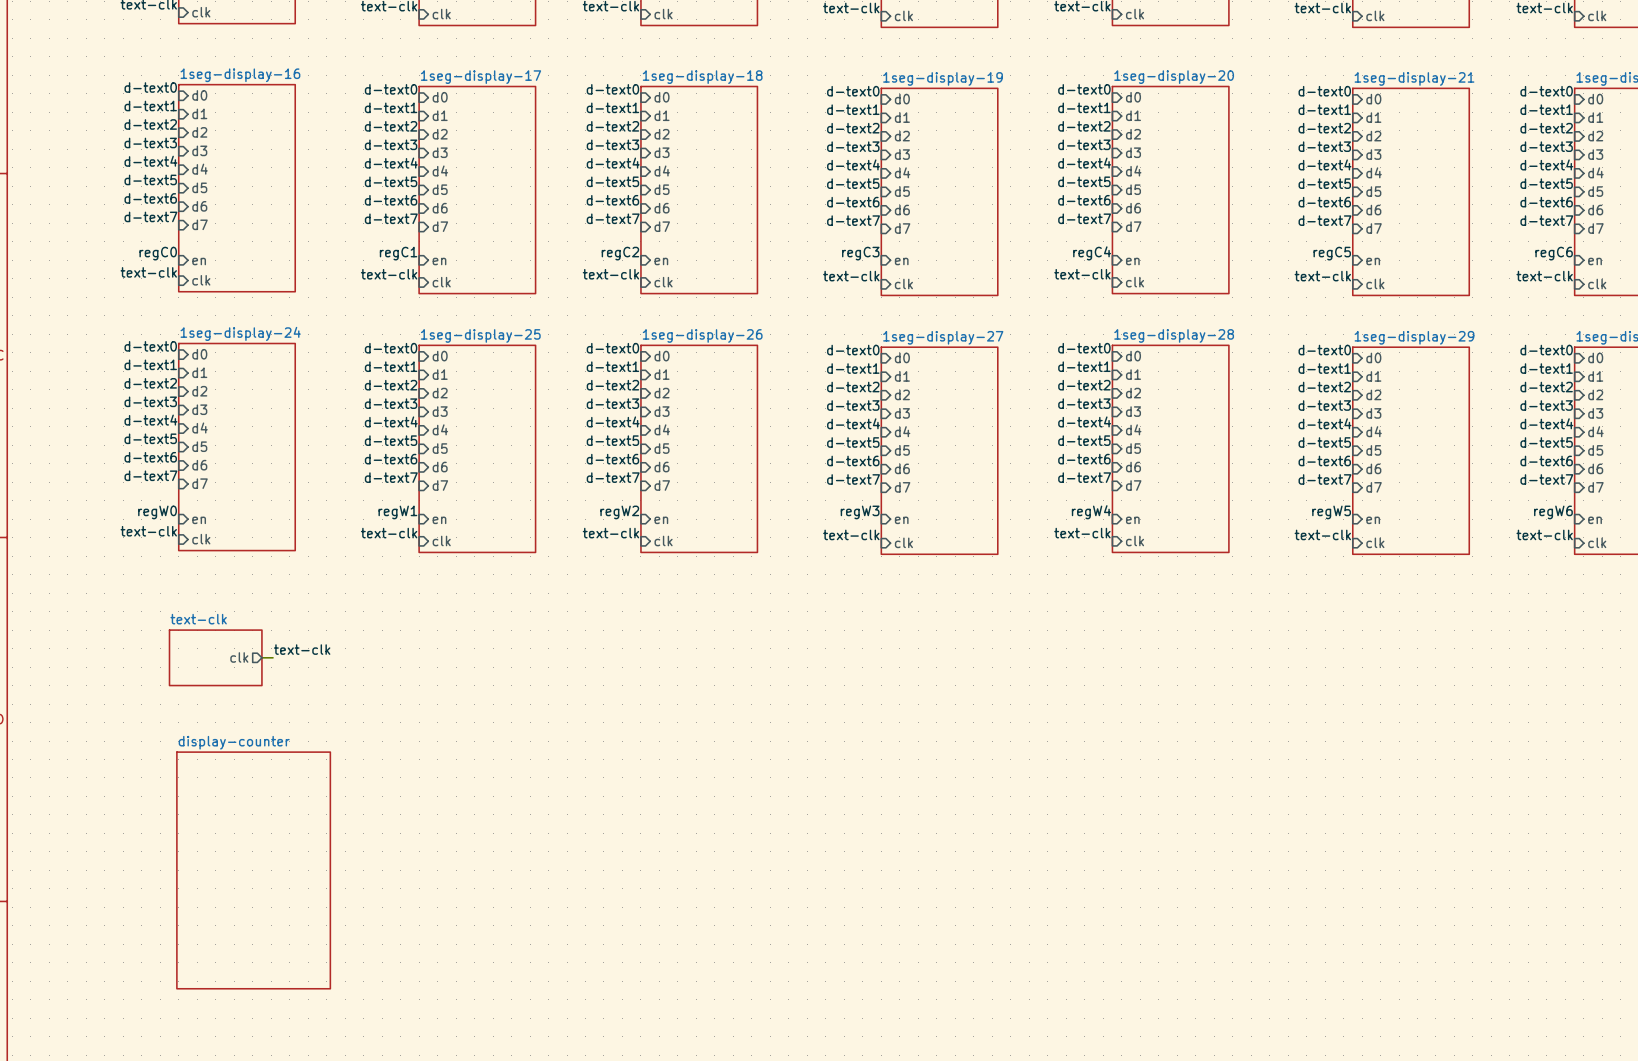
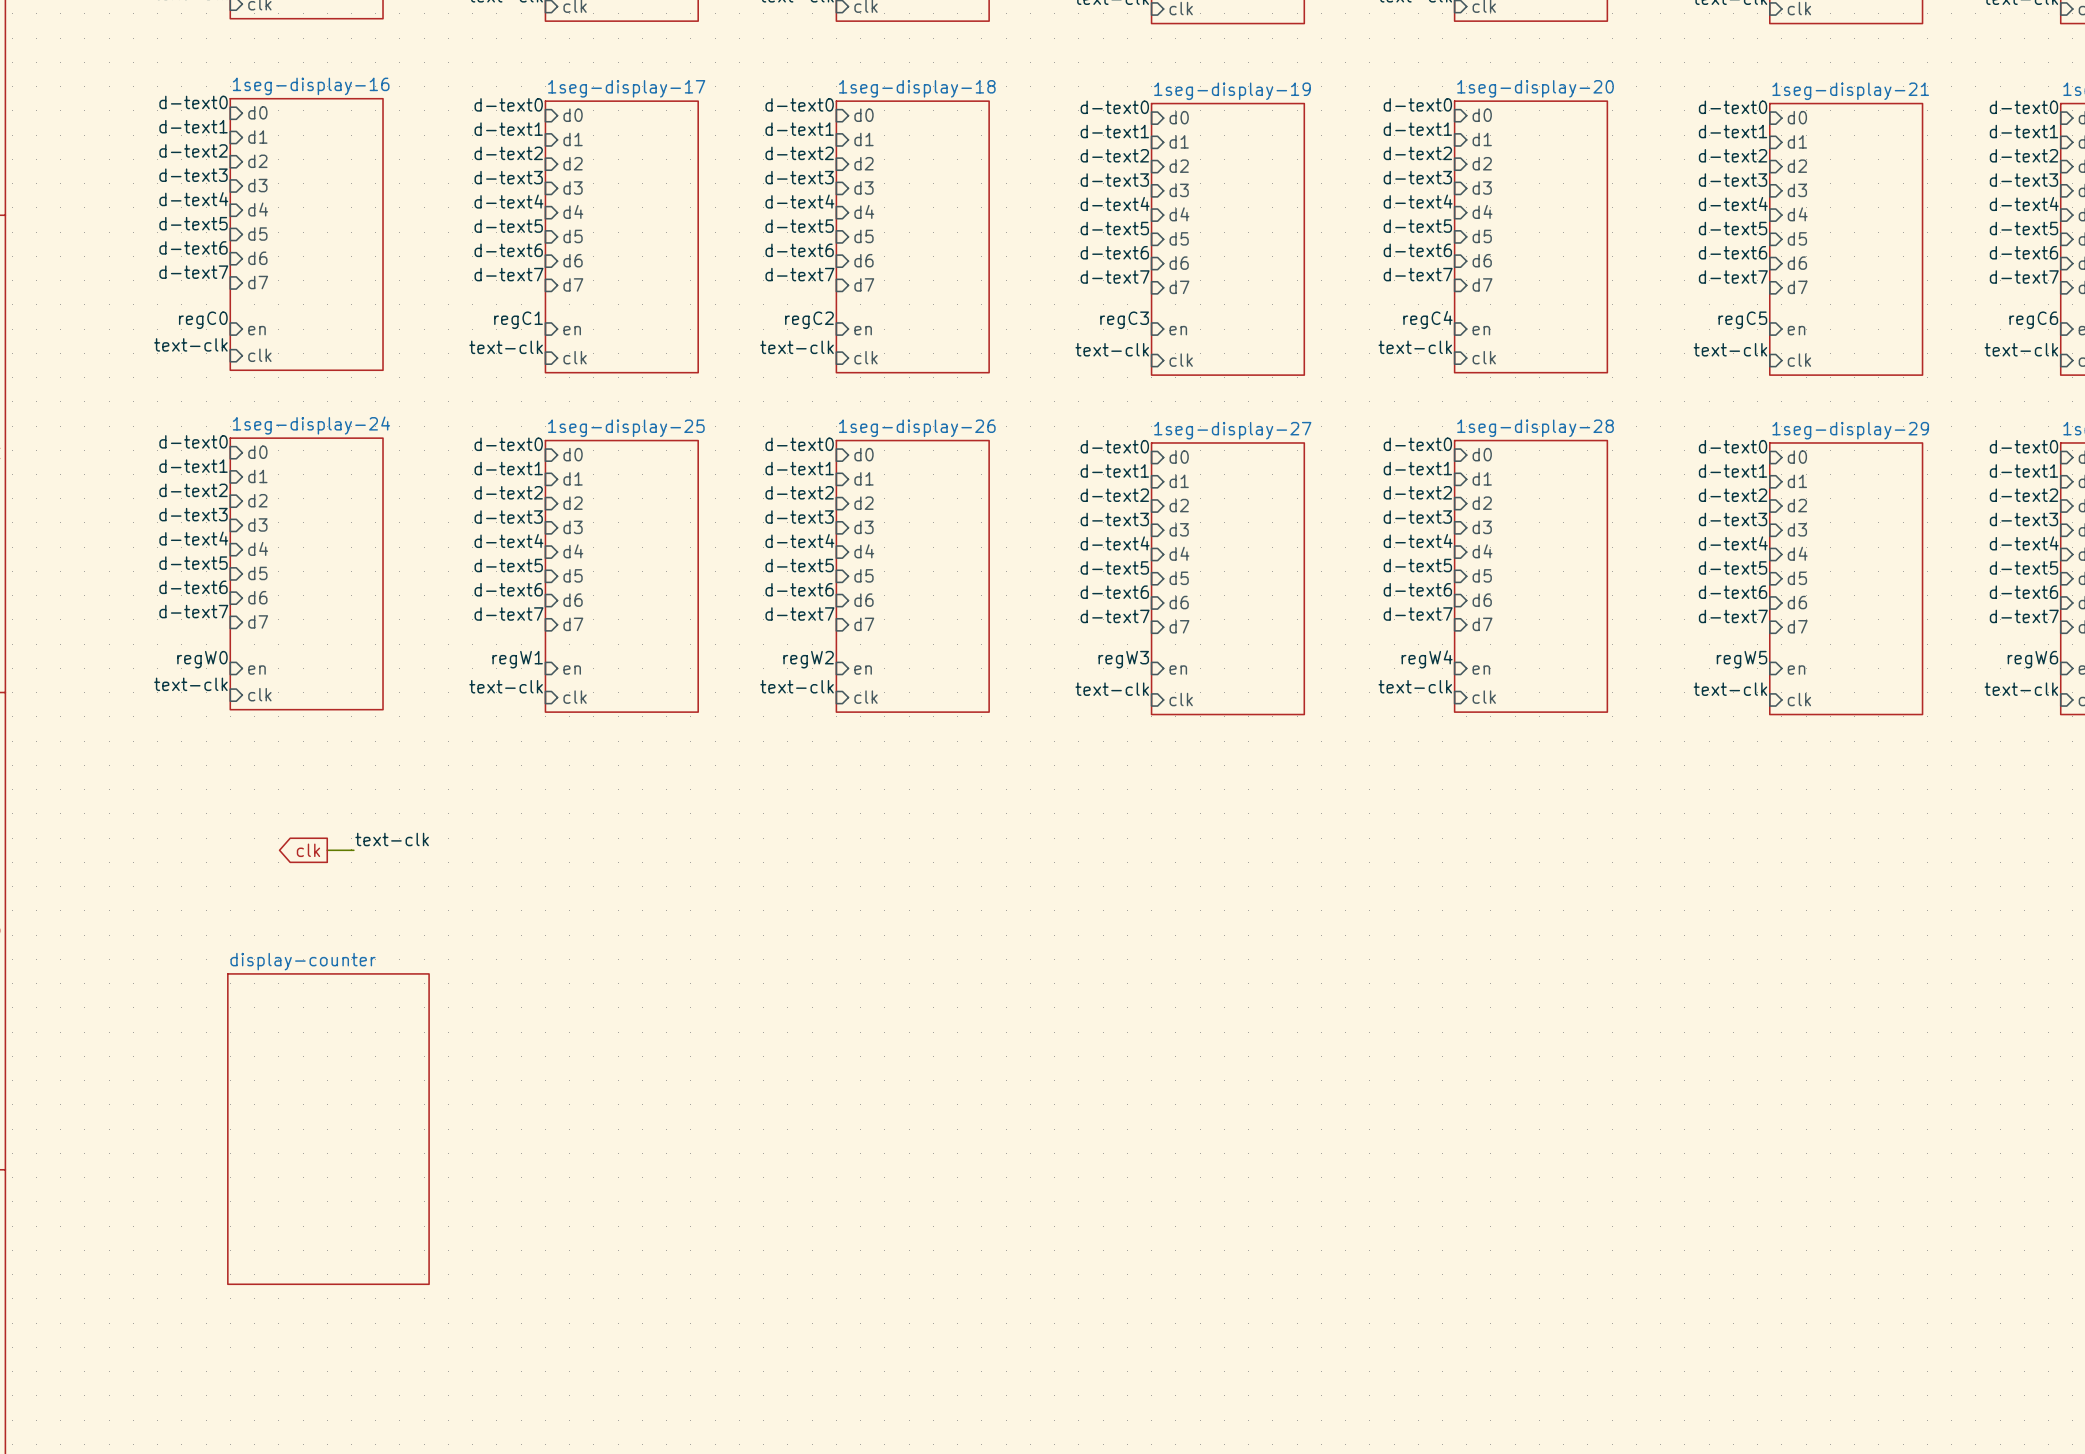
sheet text-clk: (215, 657) -> none
global label: none -> clk (308, 850)
sheet pin: clk (239, 657) -> none
wire: none -> (327, 850) (339, 850)

